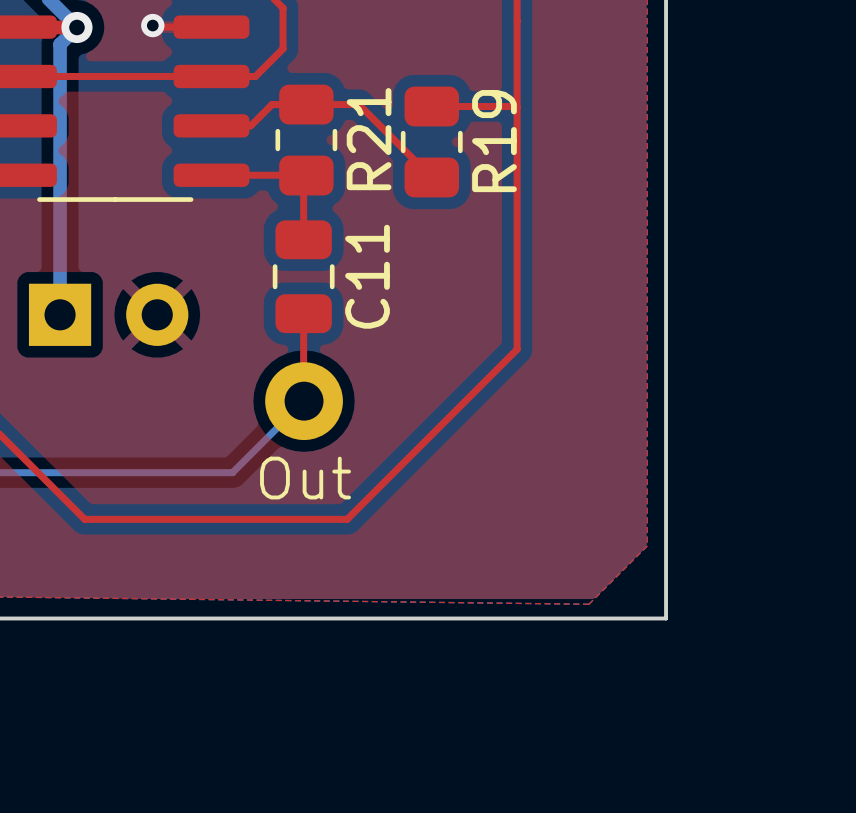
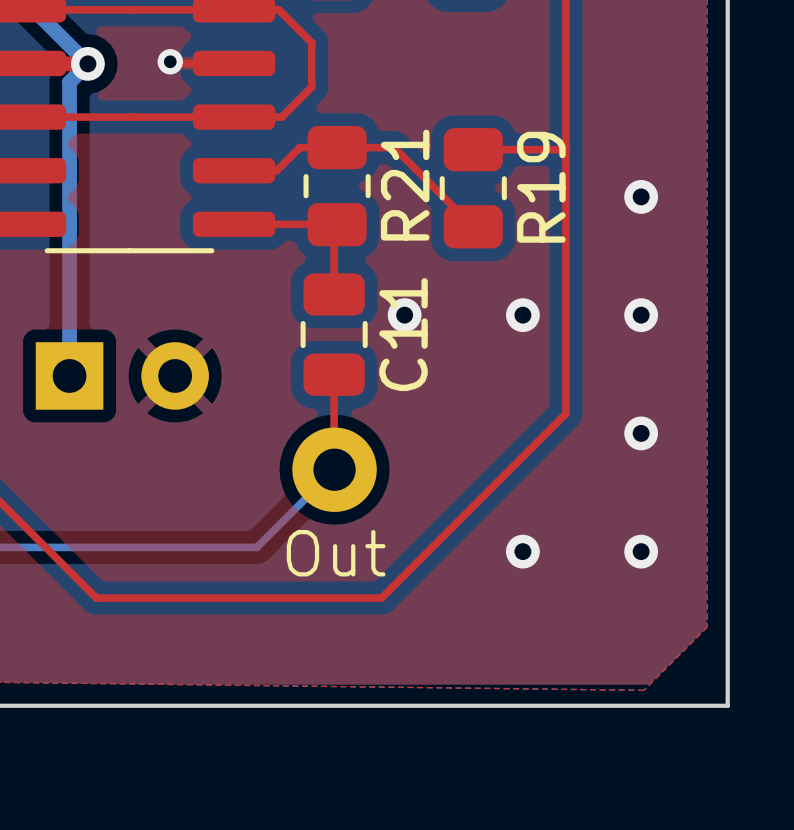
via: none -> (641, 196)
via: none -> (404, 315)
via: none -> (522, 315)
via: none -> (641, 315)
via: none -> (641, 433)
via: none -> (522, 551)
via: none -> (641, 551)

